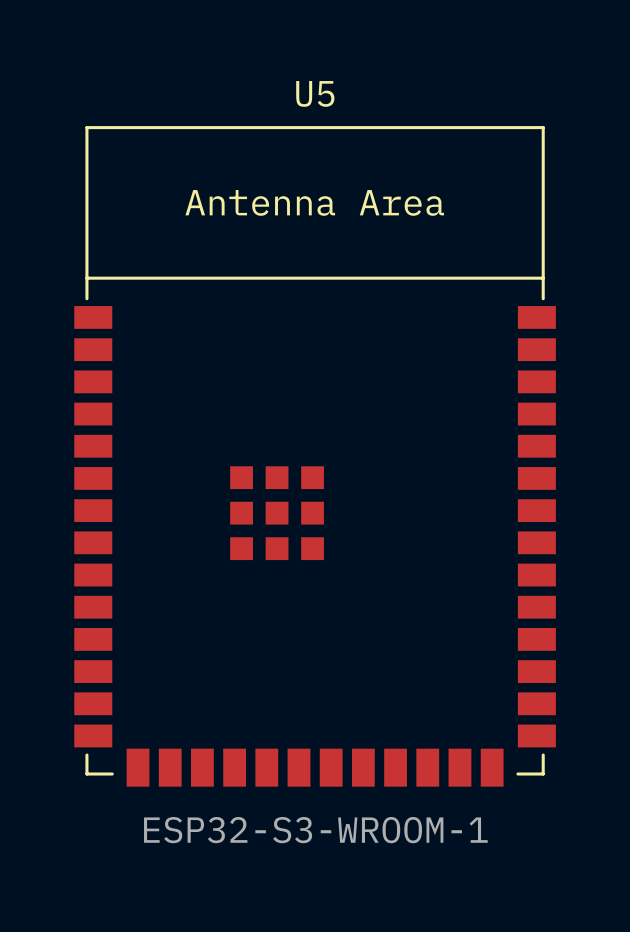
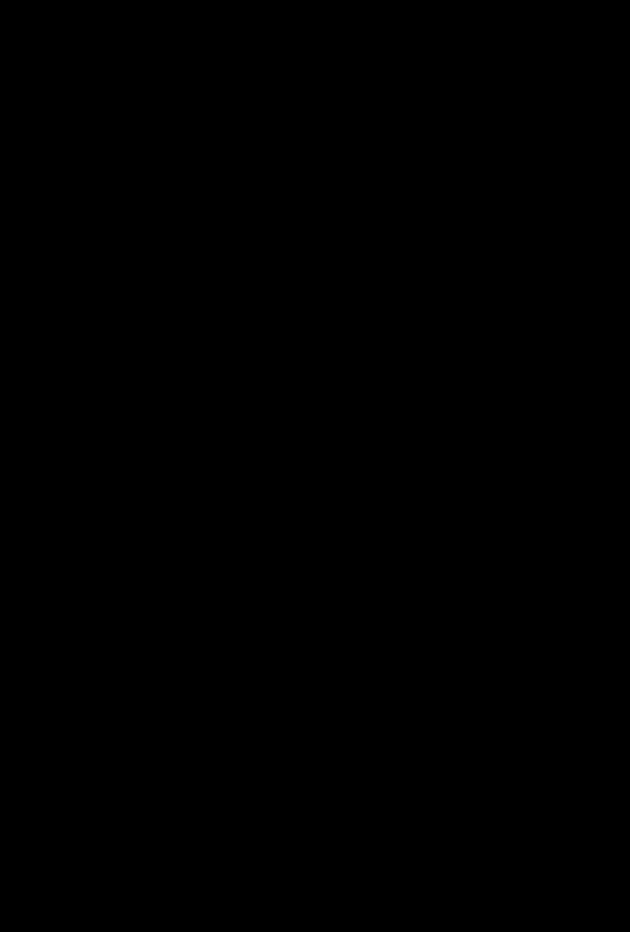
U5: ESP32-S3-WROOM-1 (315, 456) -> none

